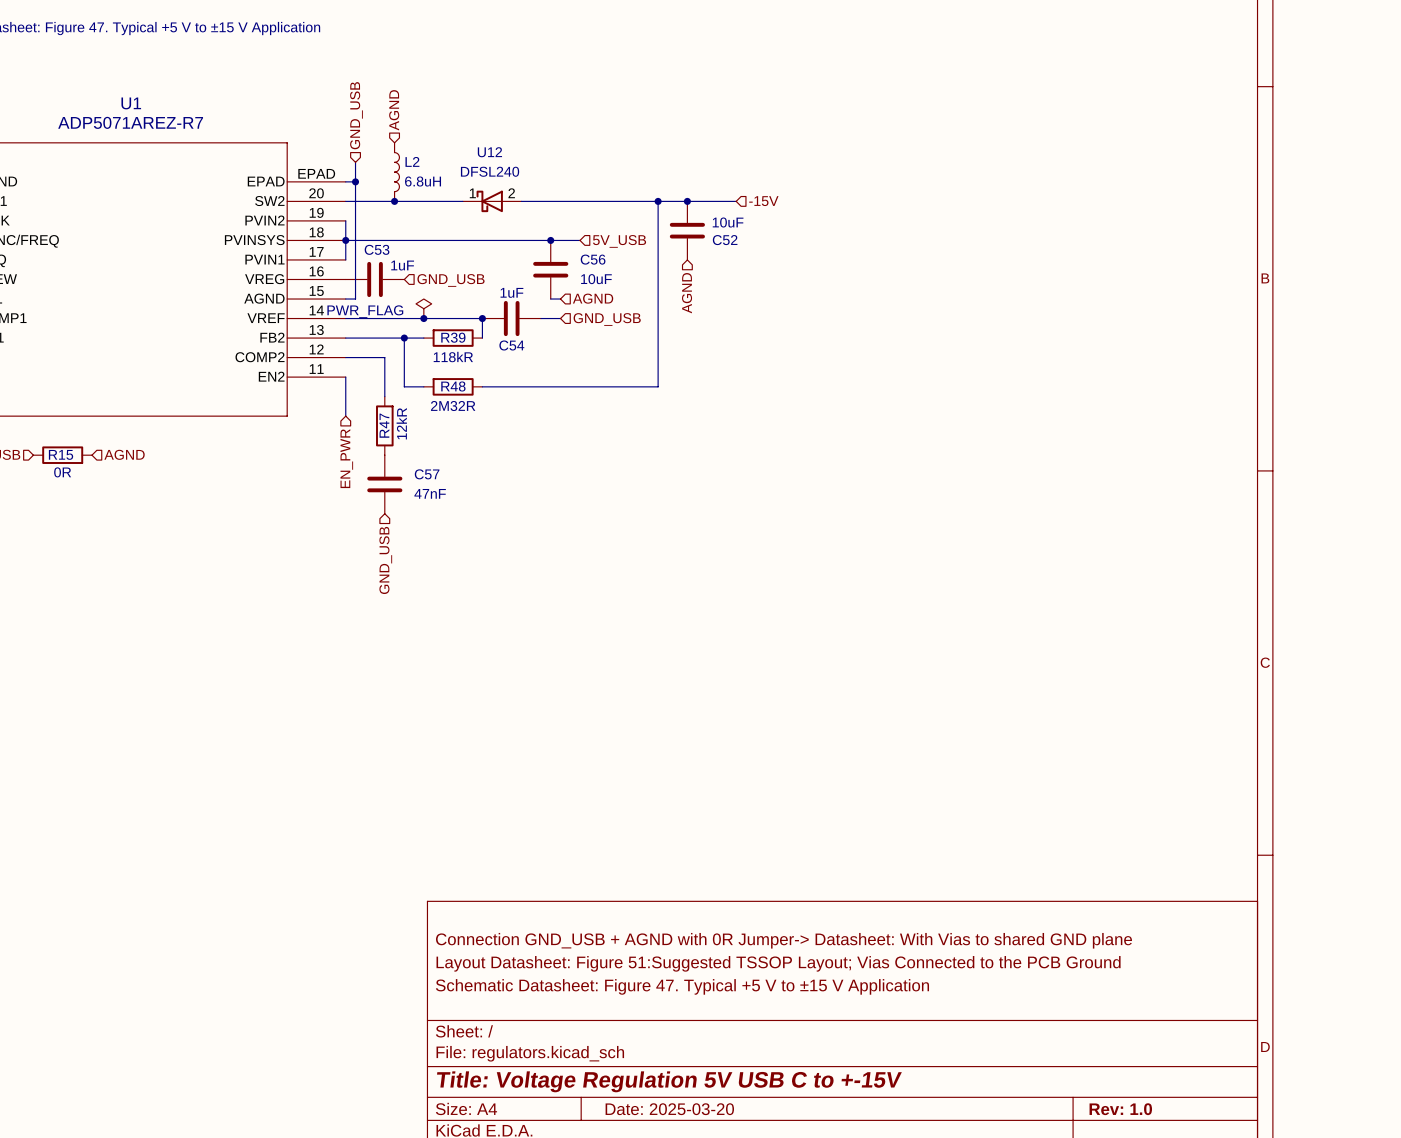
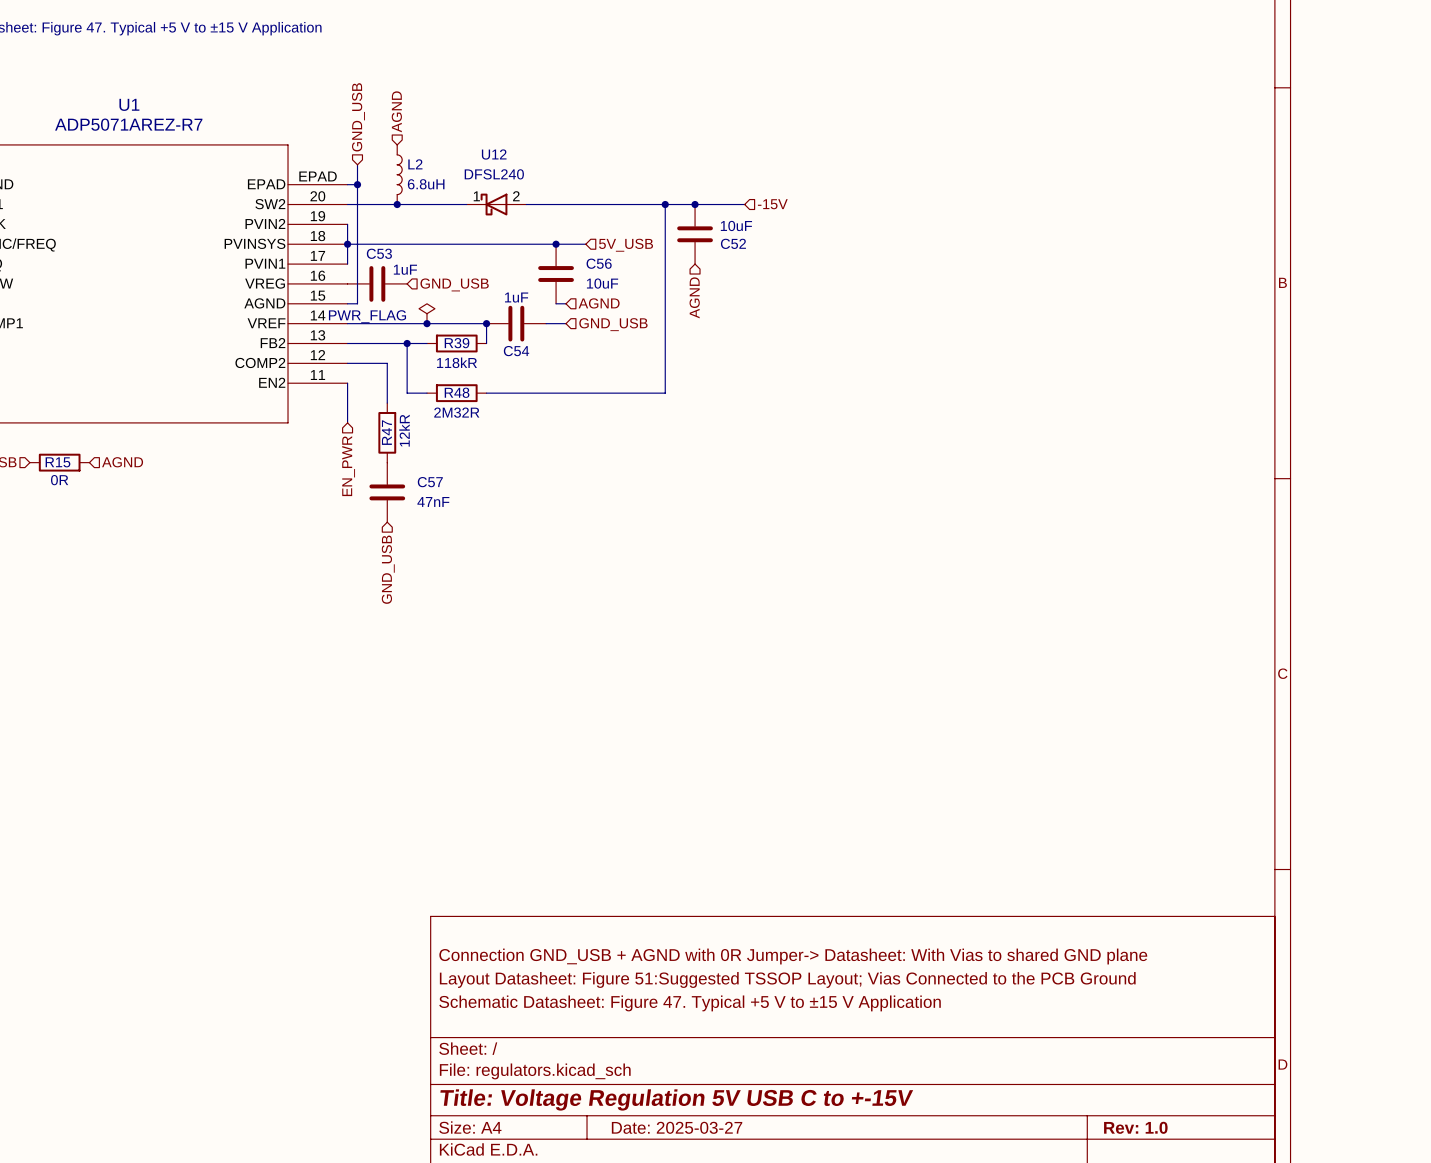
title block: Date: 2025-03-20 (669, 1109) -> Date: 2025-03-27 (677, 1127)

